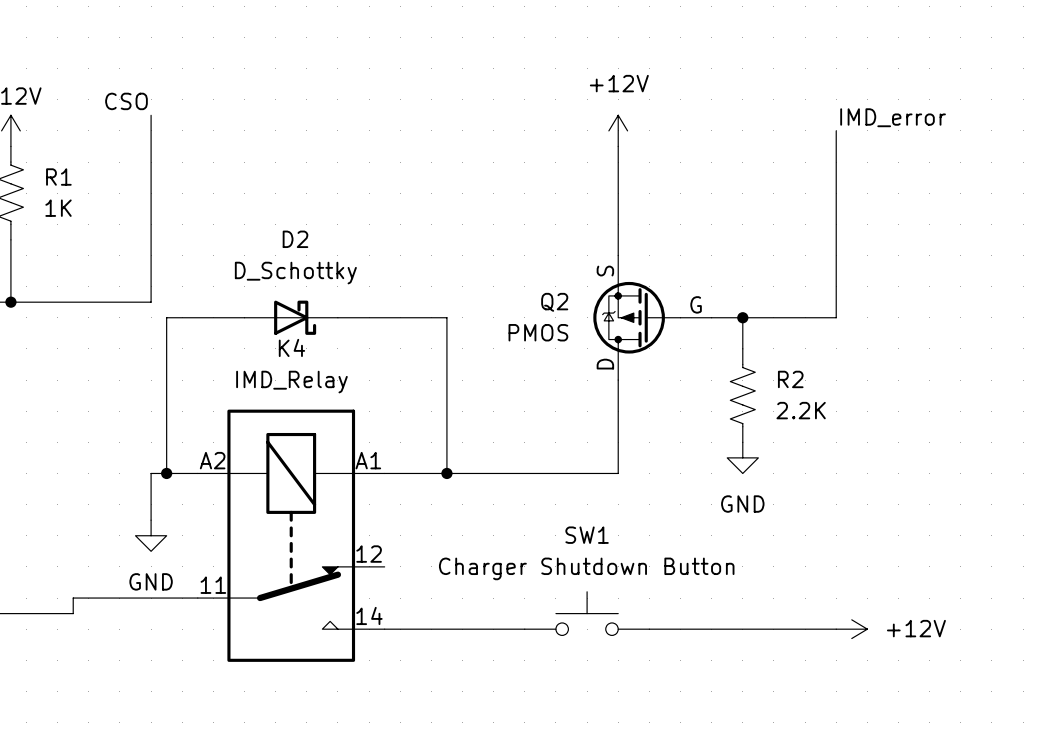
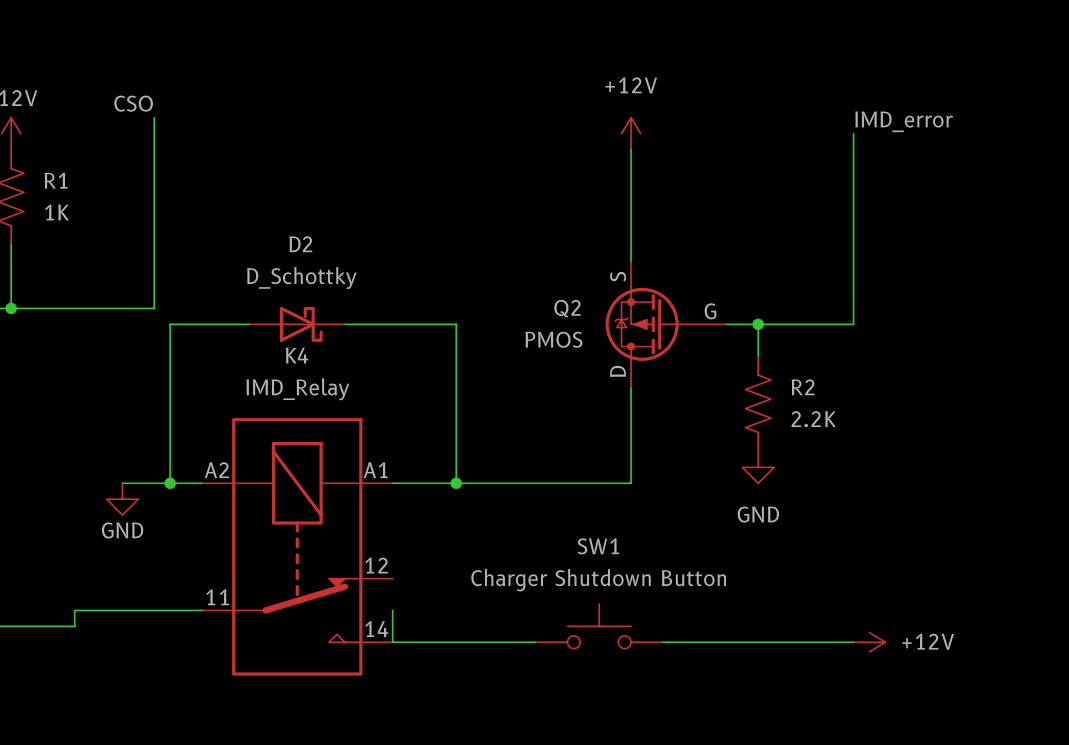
wire: (151, 473) (151, 520) -> (154, 483) (122, 483)
power symbol position: GND (151, 535) -> GND (122, 499)
power symbol text position: GND (151, 581) -> GND (122, 530)
wire: none -> (392, 610) (392, 642)

